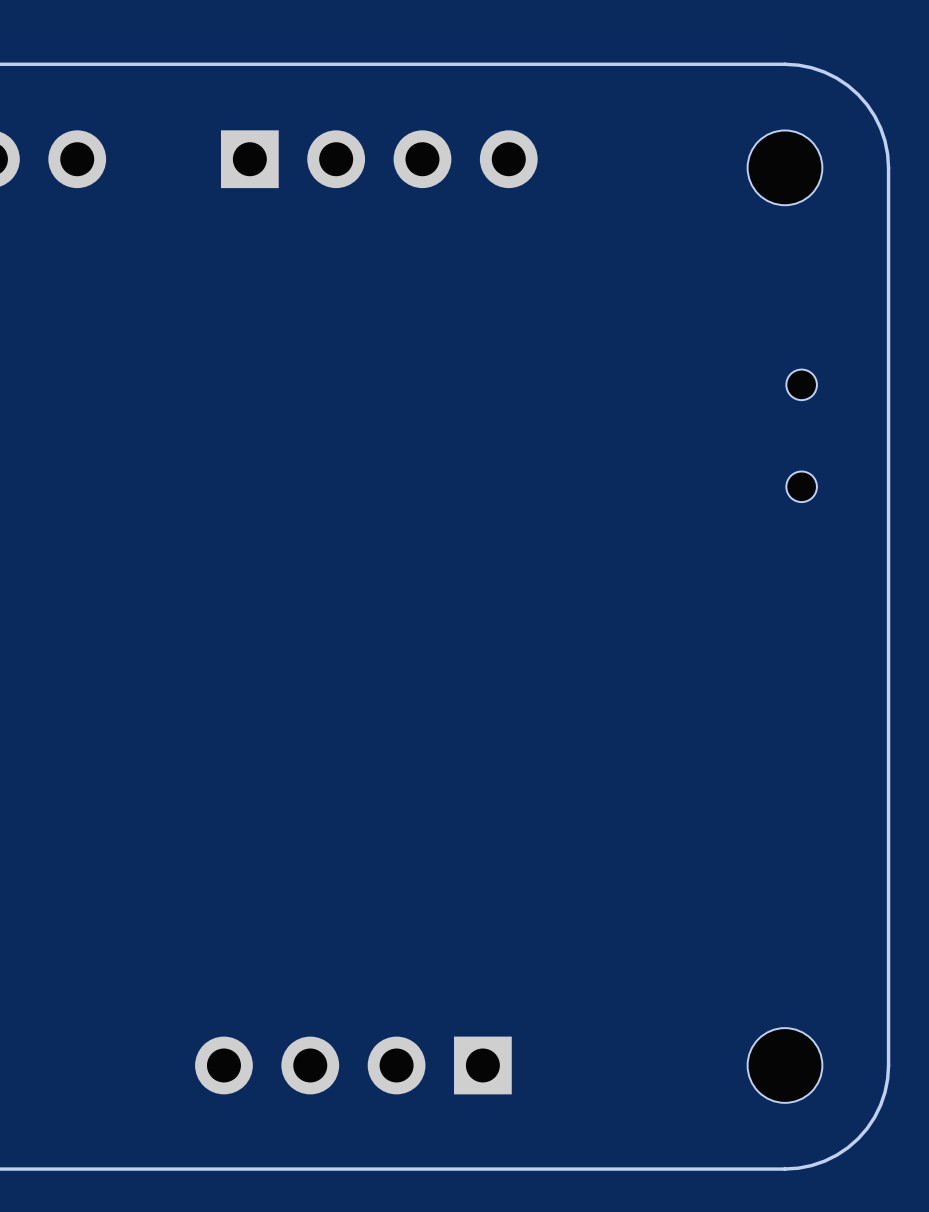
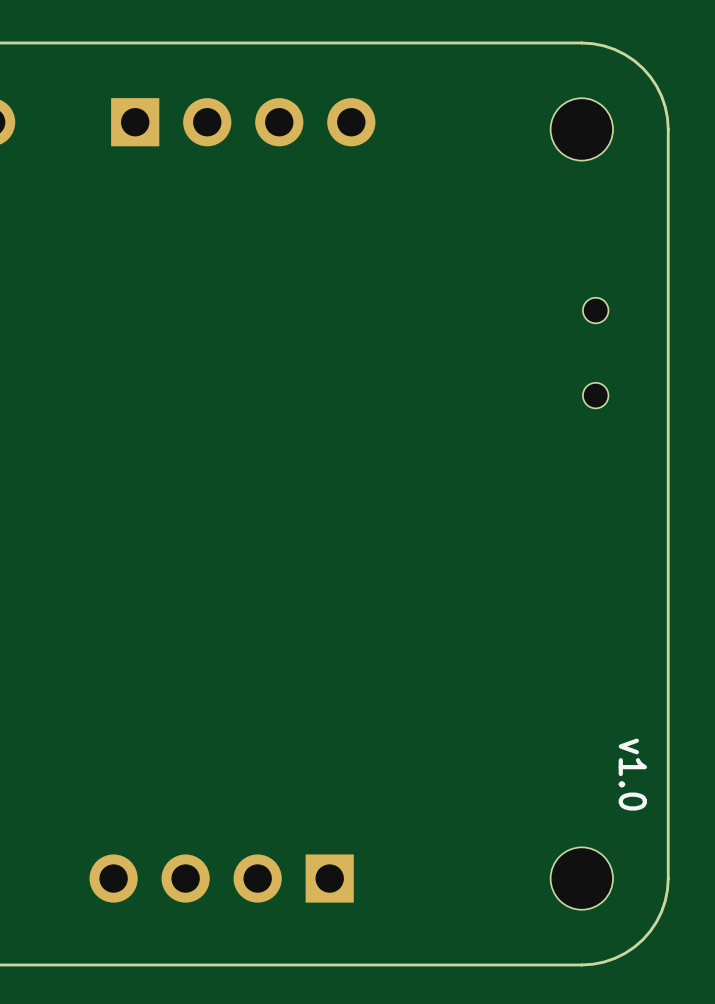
text: none -> v1.0 (632, 774)

